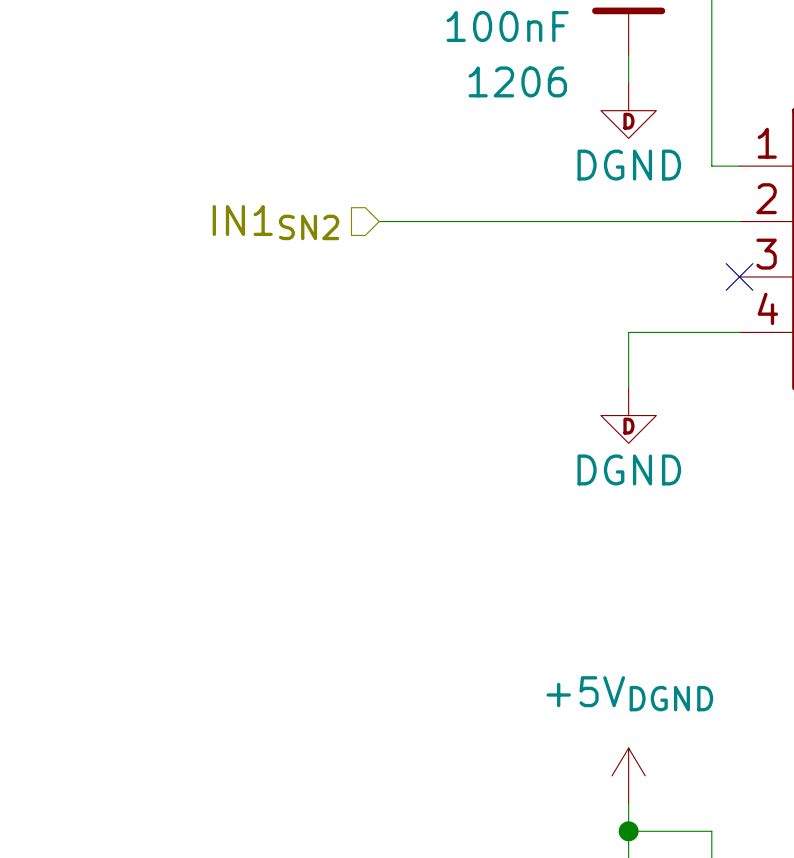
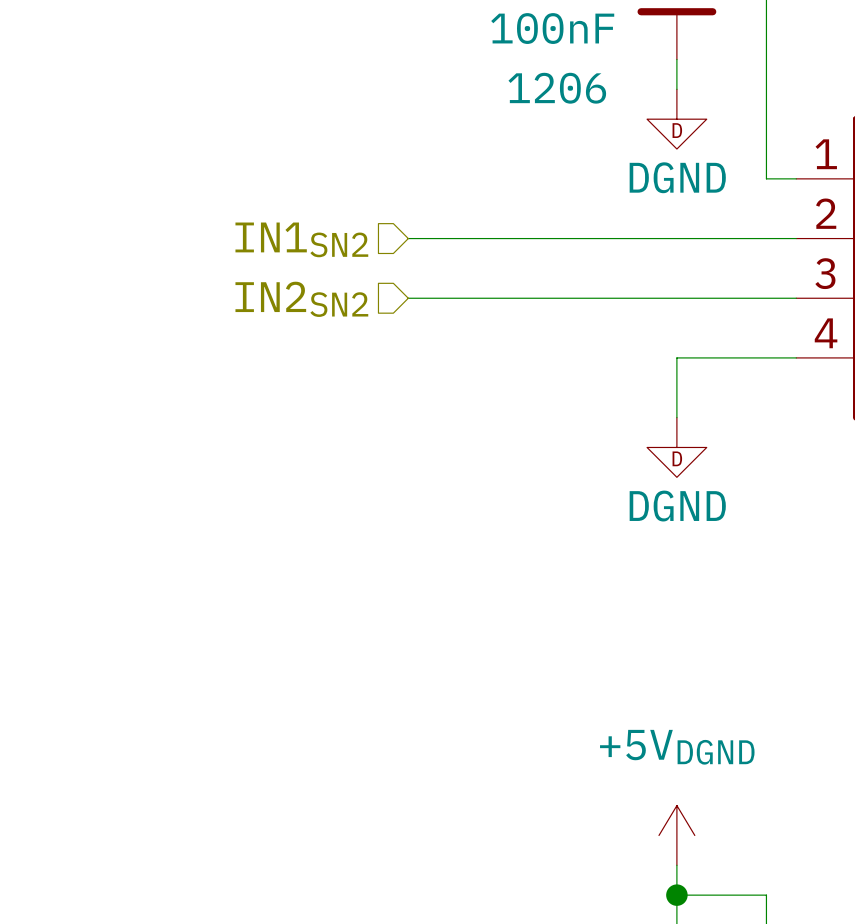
wire: none -> (408, 298) (796, 298)
no-connect mark: (739, 276) -> none
hierarchical label: none -> IN2SN2 (301, 299)

